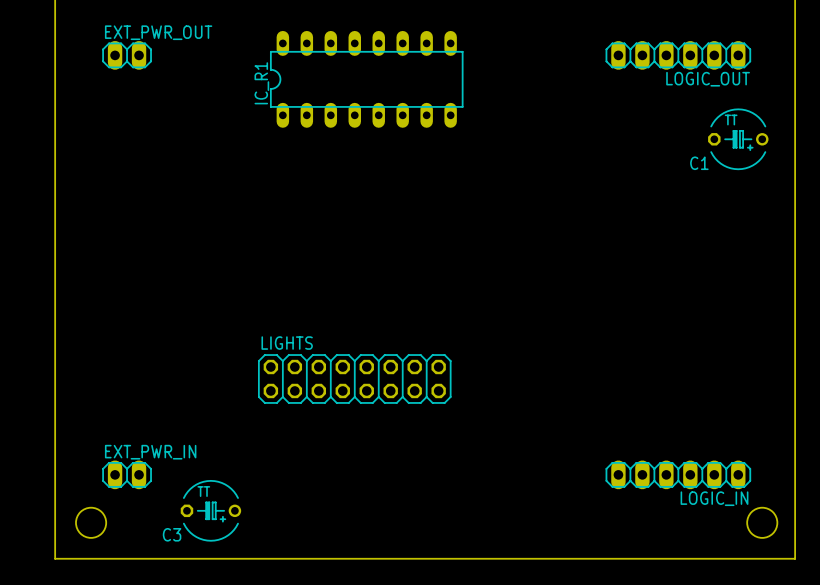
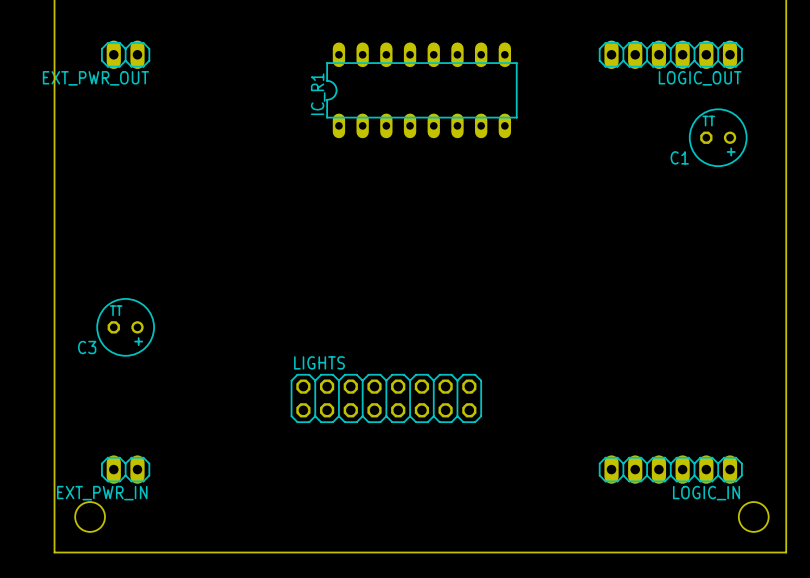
EXT_PWR_OUT name position: EXT_PWR_OUT (158, 32) -> EXT_PWR_OUT (95, 78)
IC_R1 position: (366, 79) -> (421, 90)
C1 footprint: [708, 108, 769, 170] -> [689, 108, 748, 167]
LIGHTS position: (354, 378) -> (386, 398)
EXT_PWR_IN name position: EXT_PWR_IN (150, 452) -> EXT_PWR_IN (102, 493)
C3 footprint: [180, 480, 242, 542] -> [96, 298, 155, 357]

